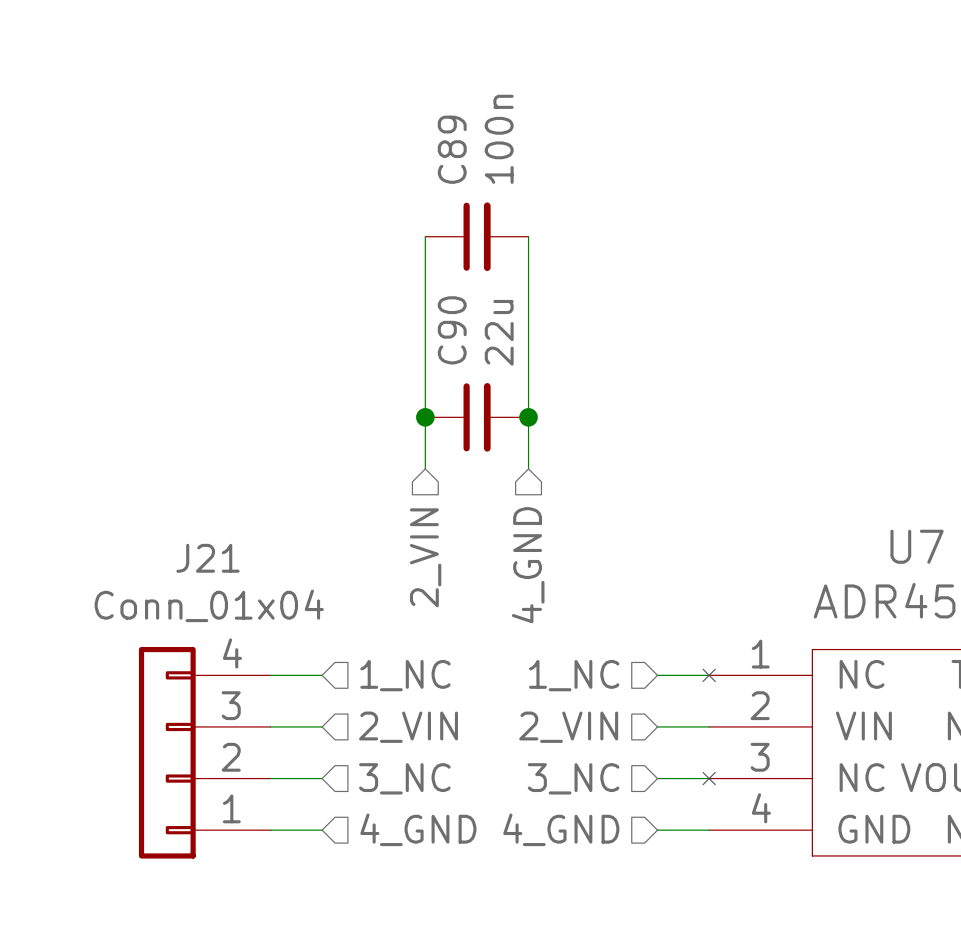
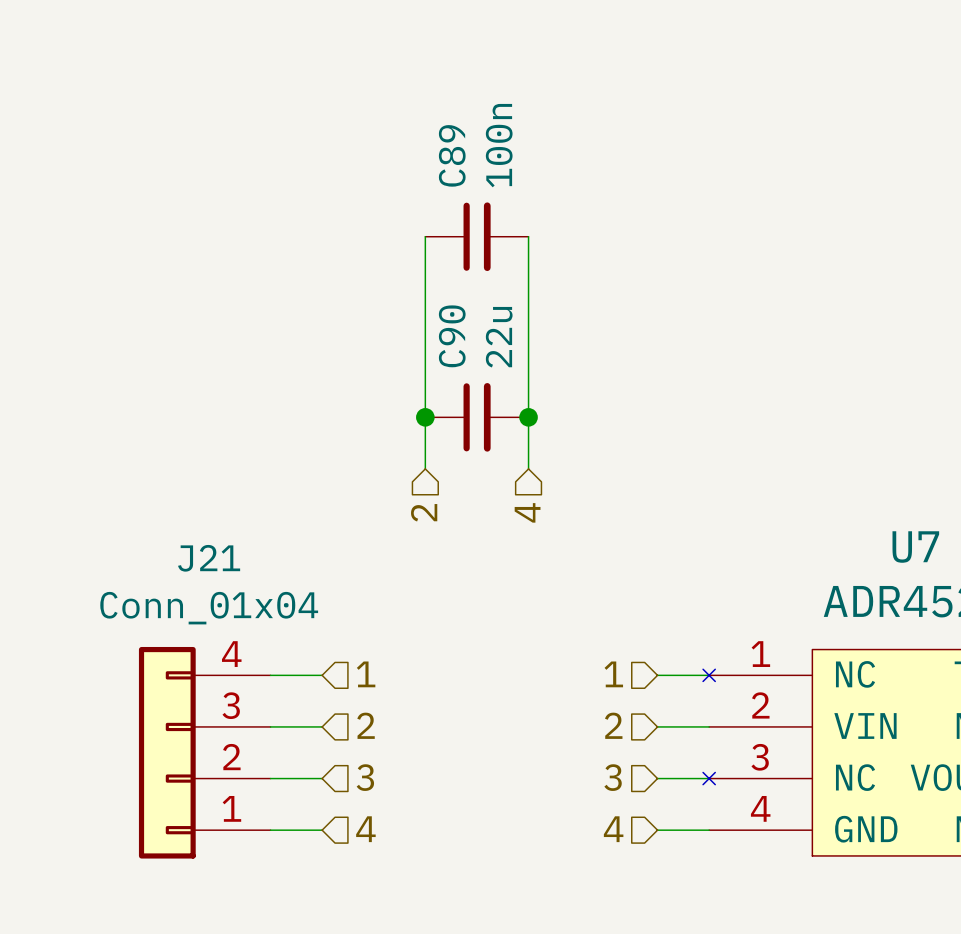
hierarchical label: 2_VIN (425, 557) -> 2 (424, 512)
hierarchical label: 4_GND (528, 565) -> 4 (527, 512)
hierarchical label: 1_NC (405, 675) -> 1 (366, 674)
hierarchical label: 1_NC (574, 675) -> 1 (613, 674)
hierarchical label: 2_VIN (408, 727) -> 2 (366, 725)
hierarchical label: 2_VIN (568, 727) -> 2 (613, 725)
hierarchical label: 3_NC (404, 778) -> 3 (365, 777)
hierarchical label: 3_NC (573, 778) -> 3 (613, 777)
hierarchical label: 4_GND (418, 829) -> 4 (365, 829)
hierarchical label: 4_GND (561, 829) -> 4 (613, 829)

